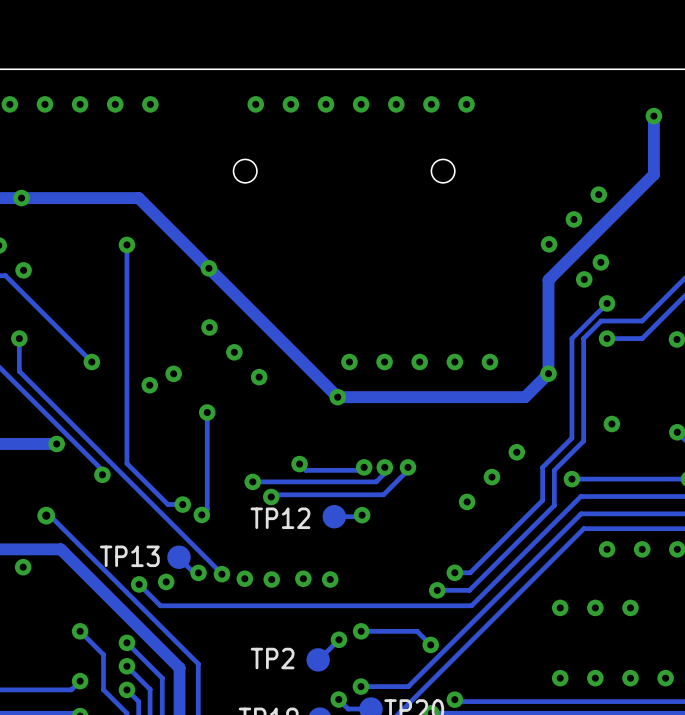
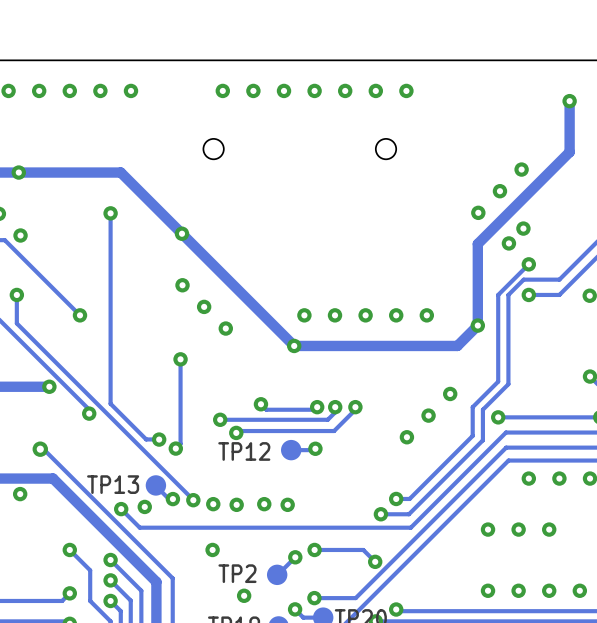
via: (173, 373) -> none
via: (149, 385) -> none
via: (611, 424) -> none
via: none -> (212, 549)
via: none -> (244, 595)

